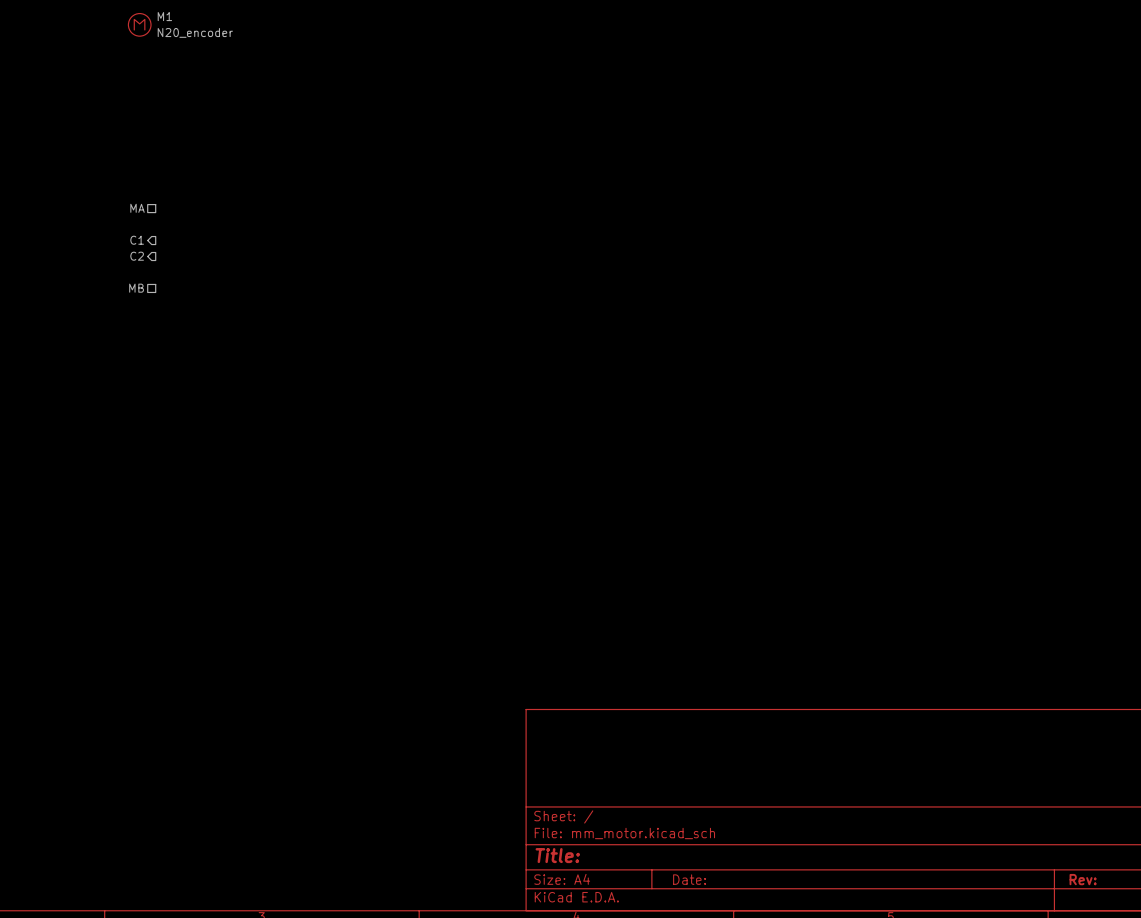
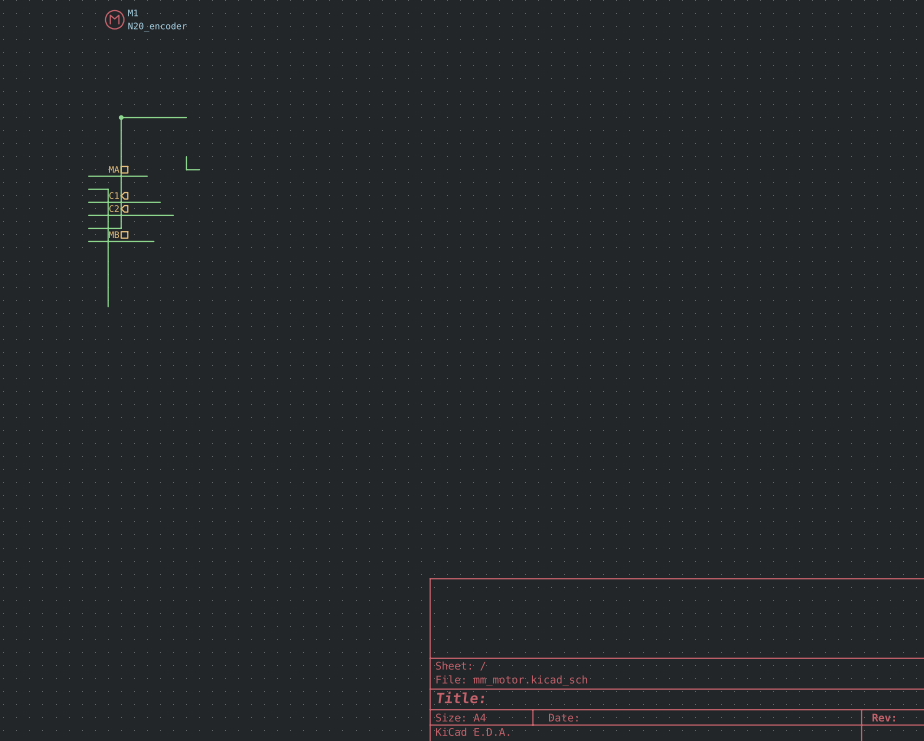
junction: none -> (121, 117)
wire: none -> (186, 117) (121, 117) (121, 228) (88, 228)
wire: none -> (186, 156) (186, 169) (199, 169)
wire: none -> (88, 176) (147, 176)
wire: none -> (88, 189) (108, 189) (108, 306)
wire: none -> (88, 202) (160, 202)
wire: none -> (88, 215) (173, 215)
wire: none -> (88, 241) (153, 241)

